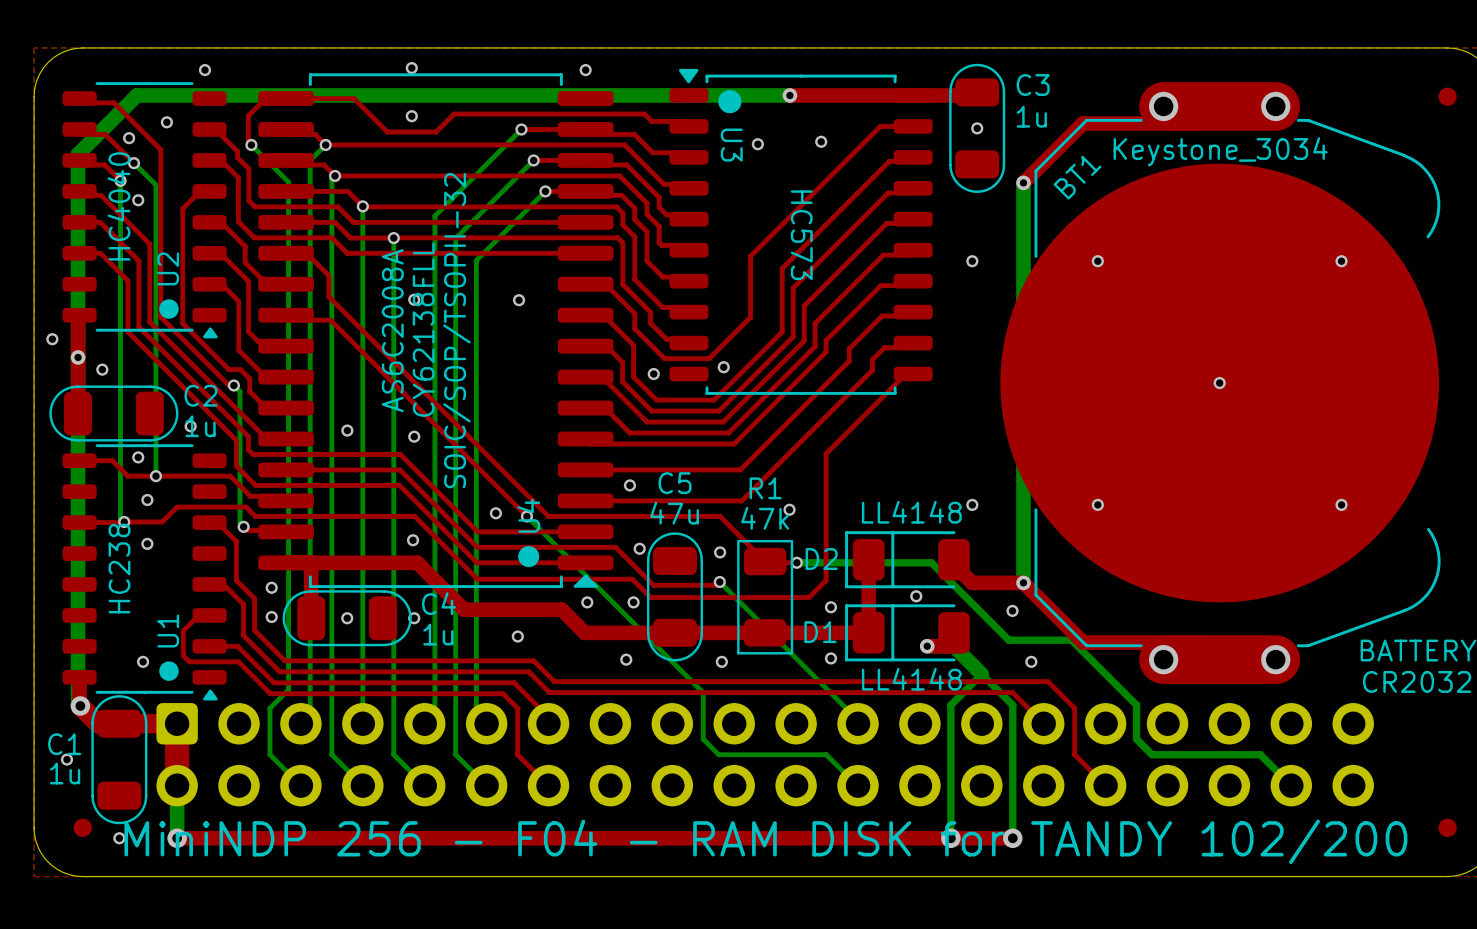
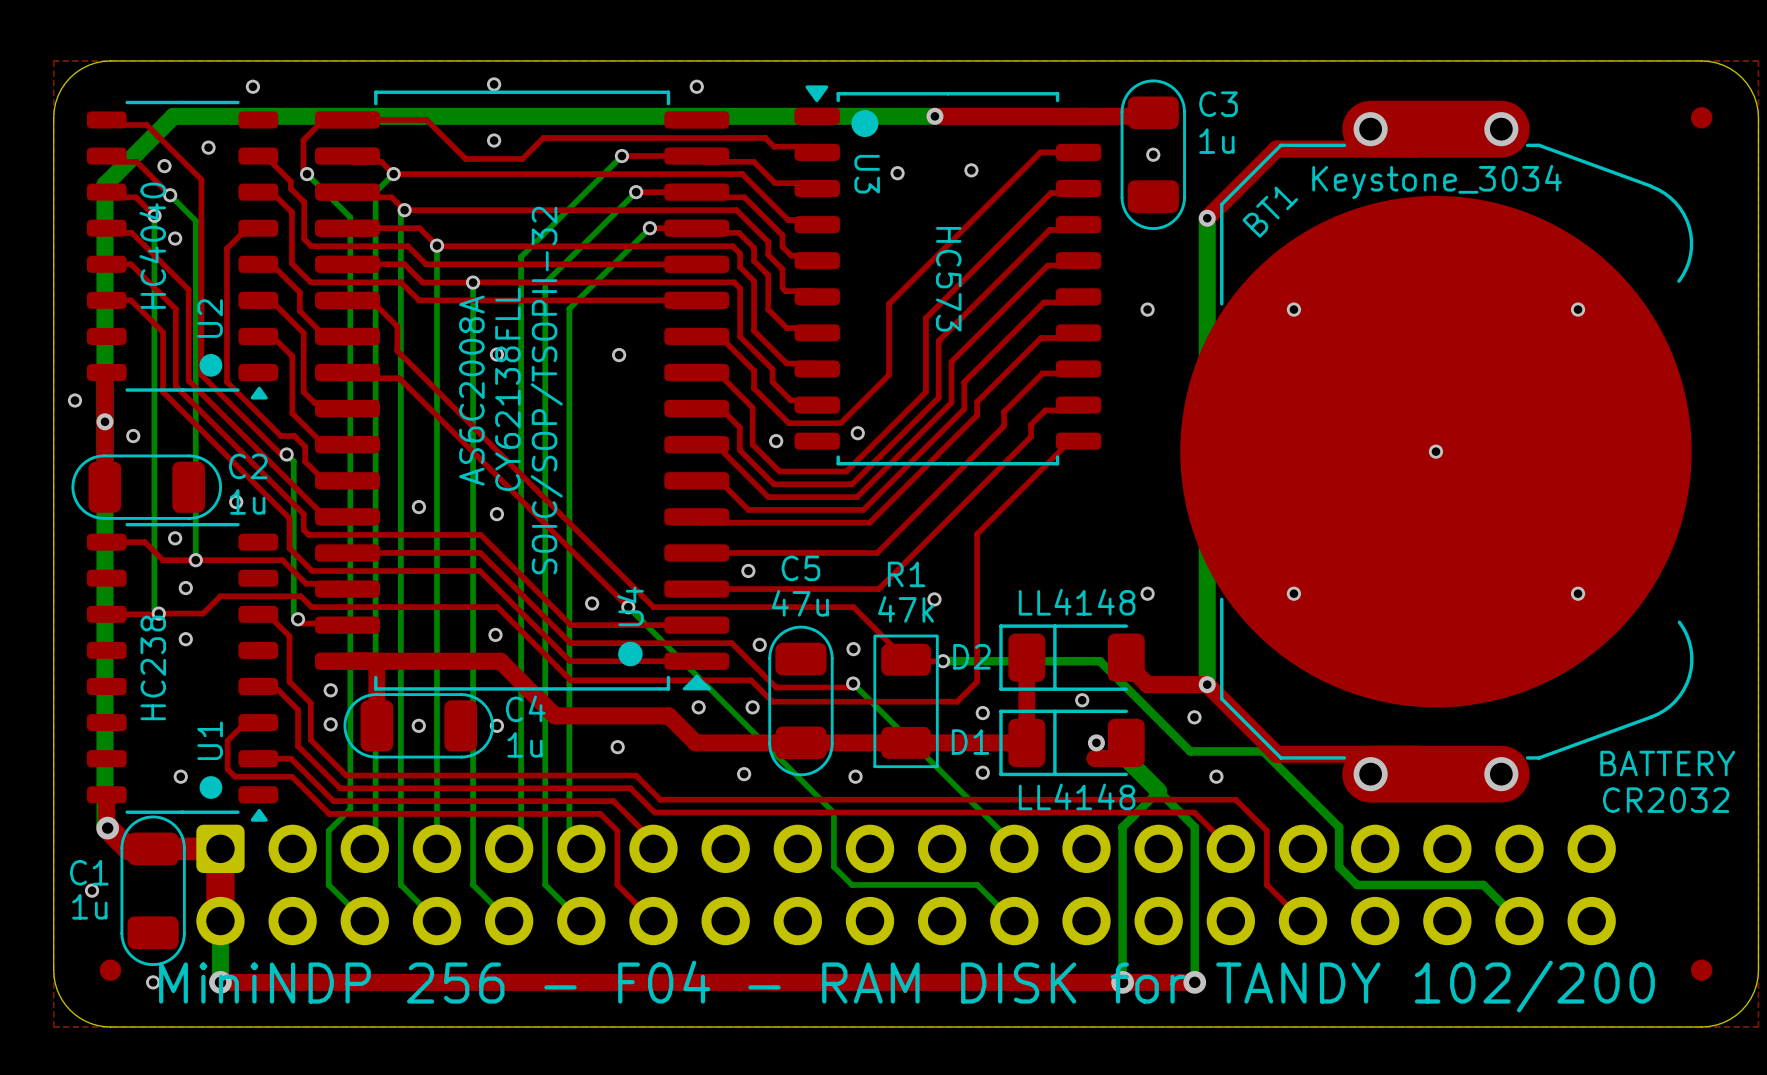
via position: (927, 646) -> (1096, 742)

